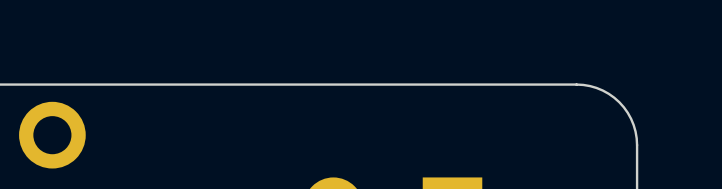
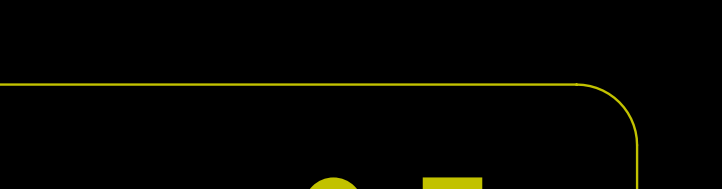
part: (52, 135) -> none

